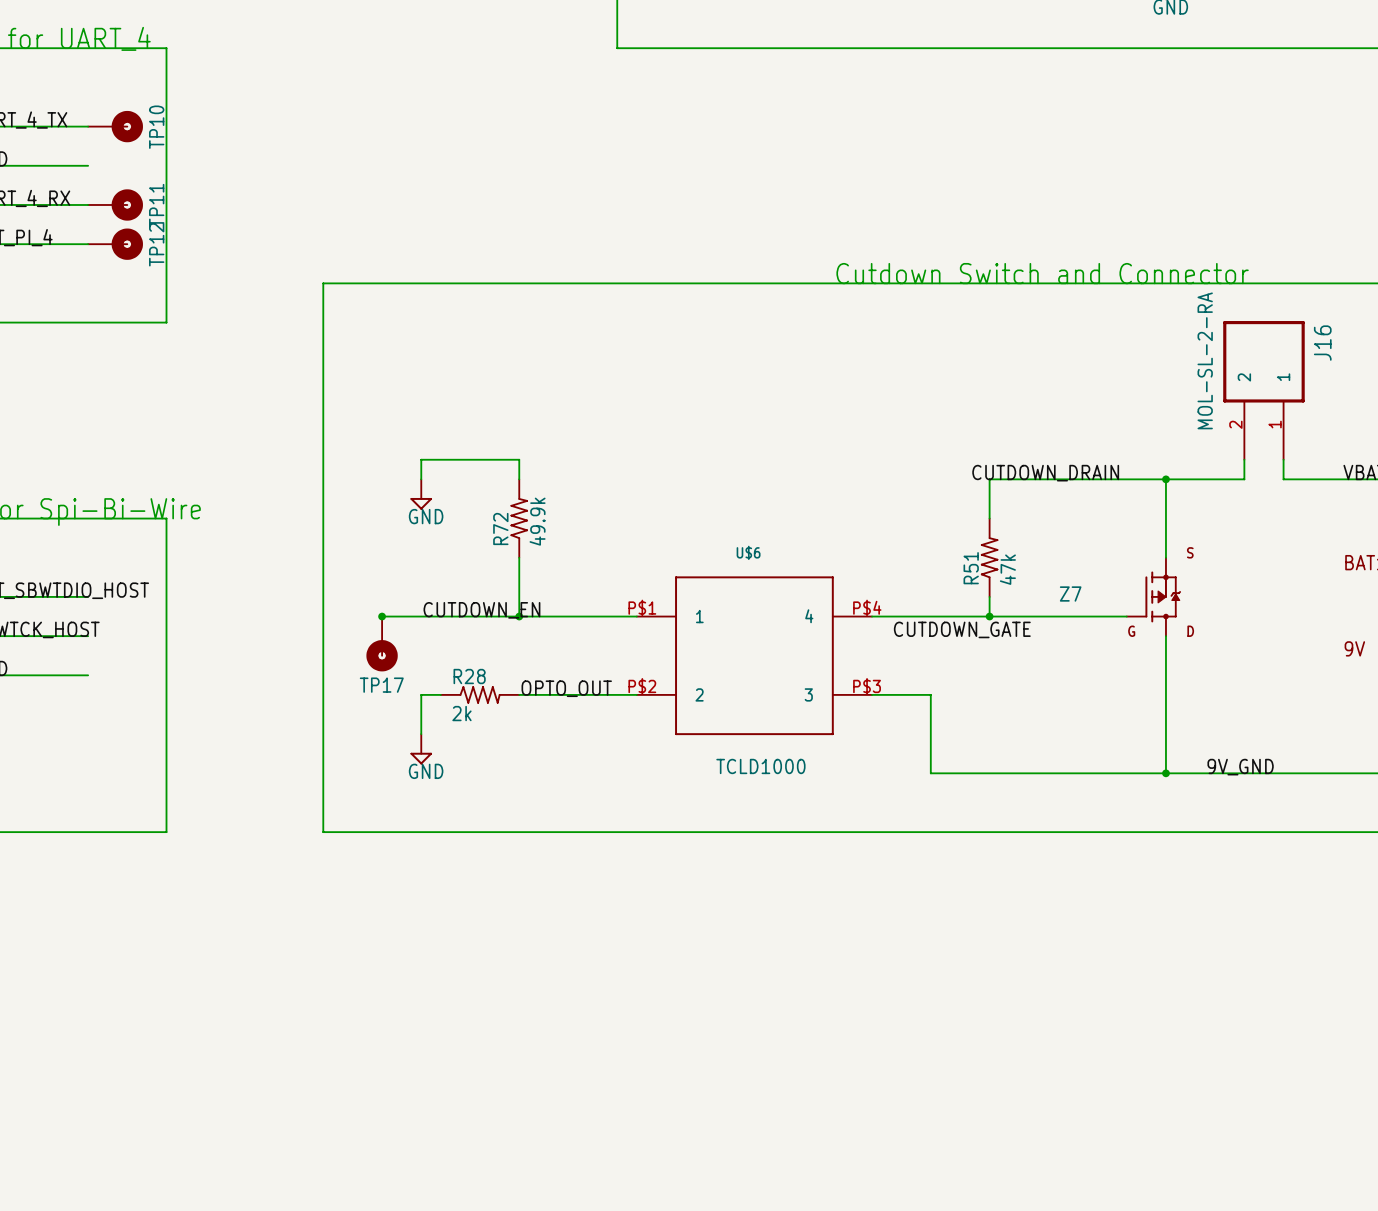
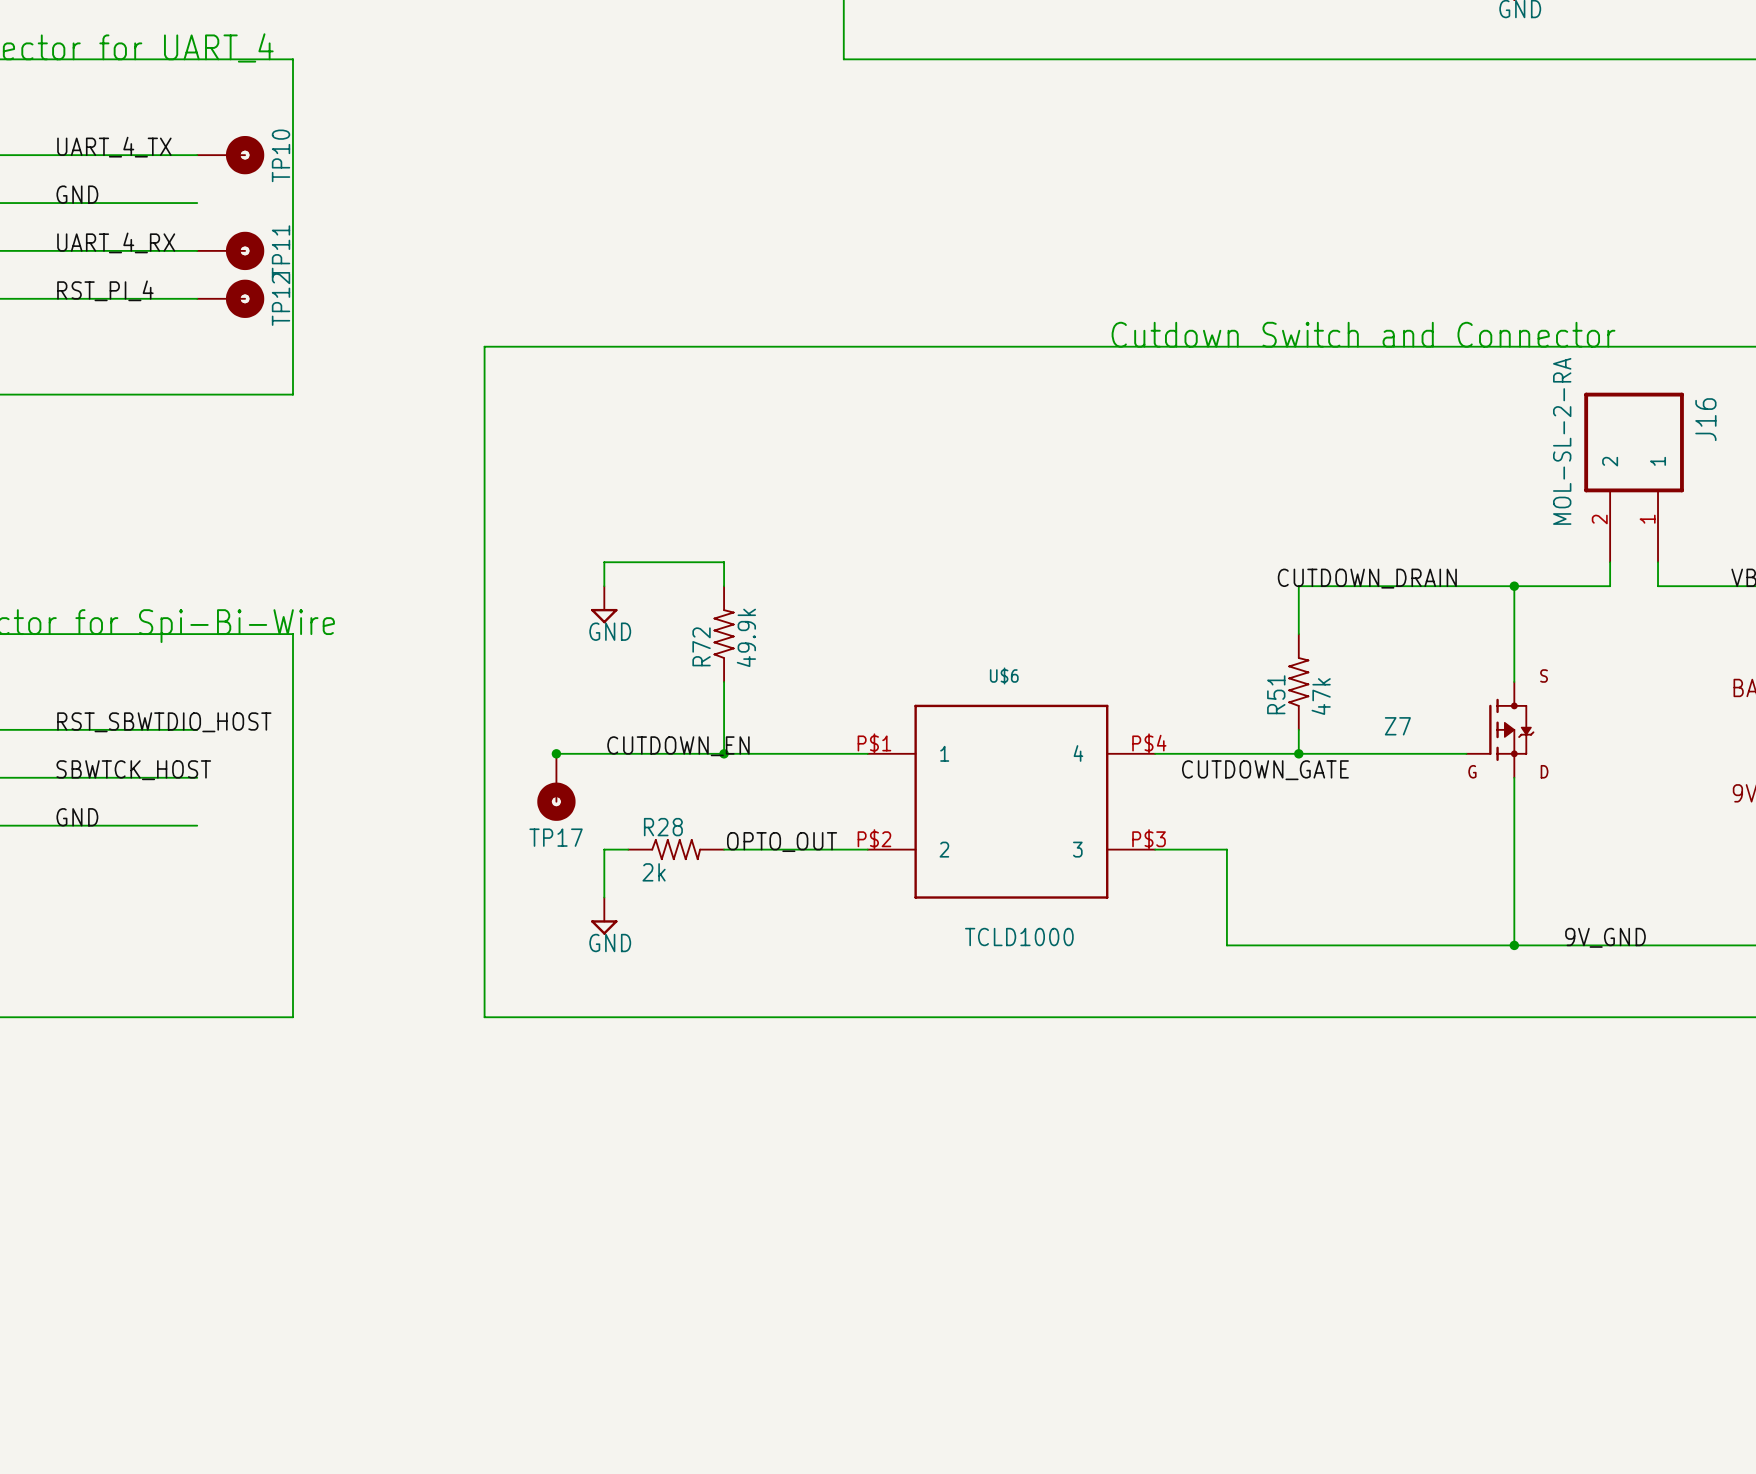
Z7 symbol: [1126, 557, 1181, 637] -> [1466, 681, 1535, 778]

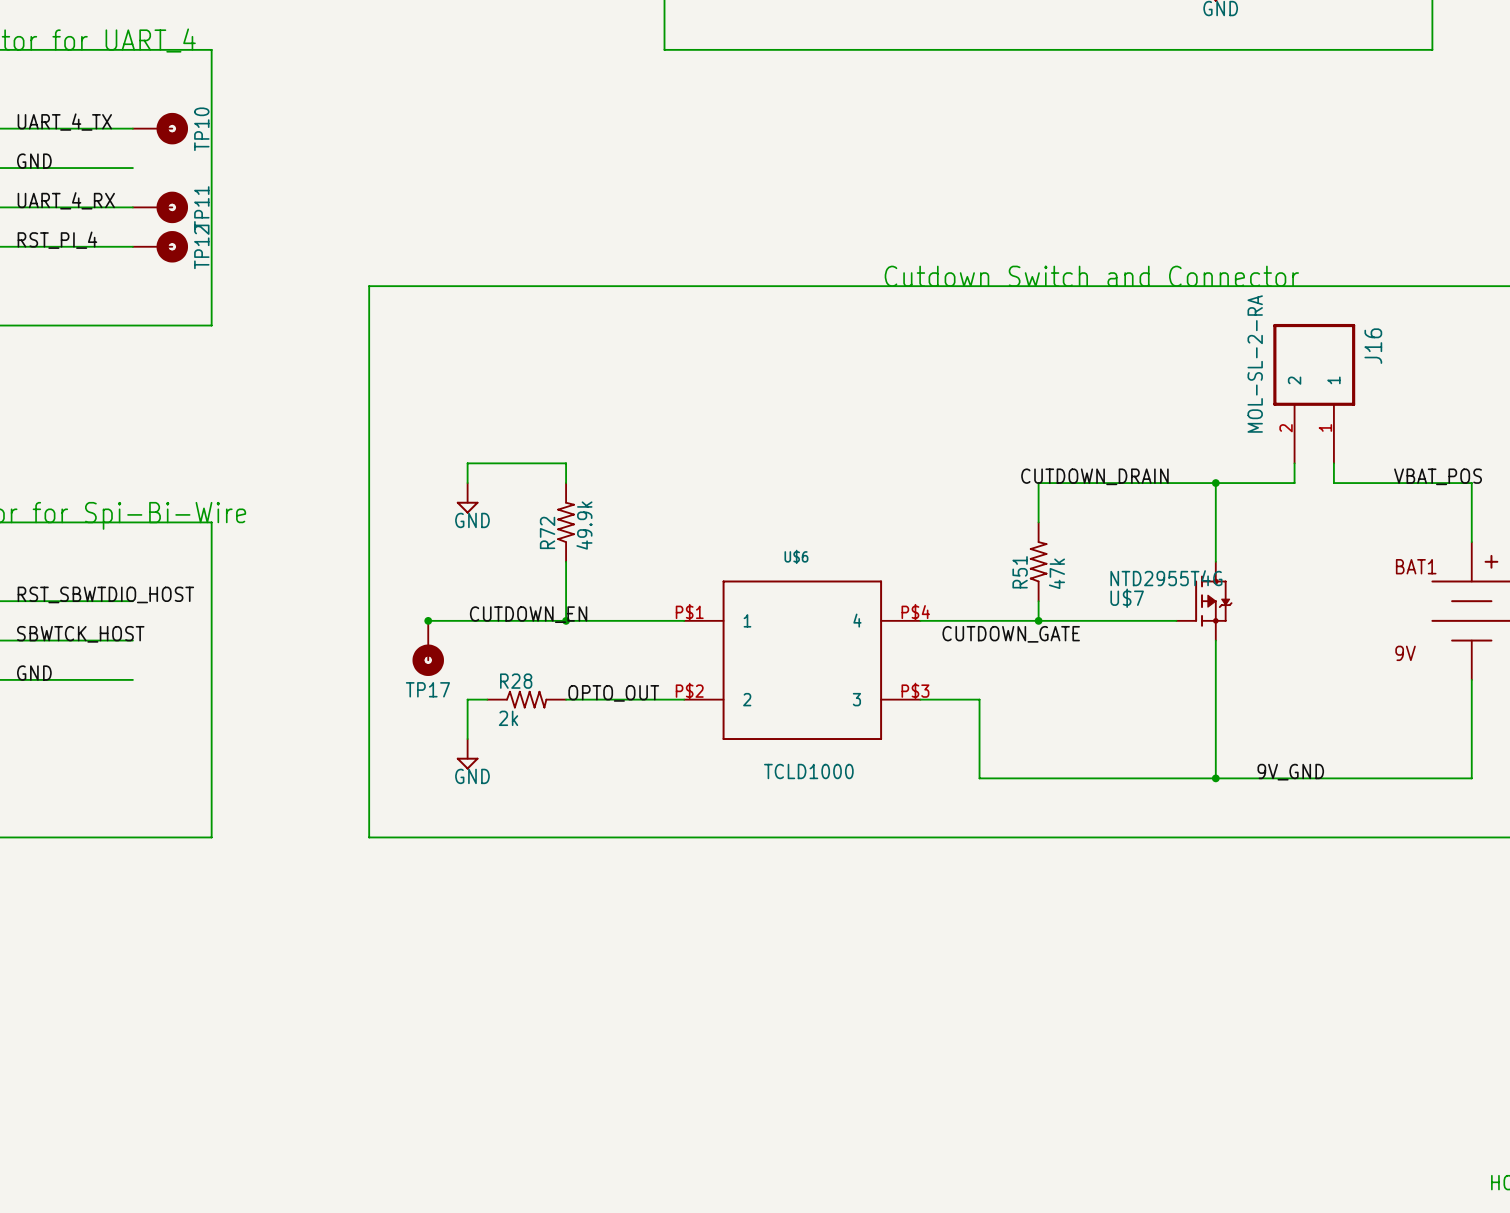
Z7 text: S (1544, 675) -> none
Z7 value: none -> NTD2955T4G (1166, 578)
Z7 name: Z7 (1397, 726) -> U$7 (1127, 598)
Z7 text: G (1472, 771) -> none
Z7 text: D (1544, 771) -> none

